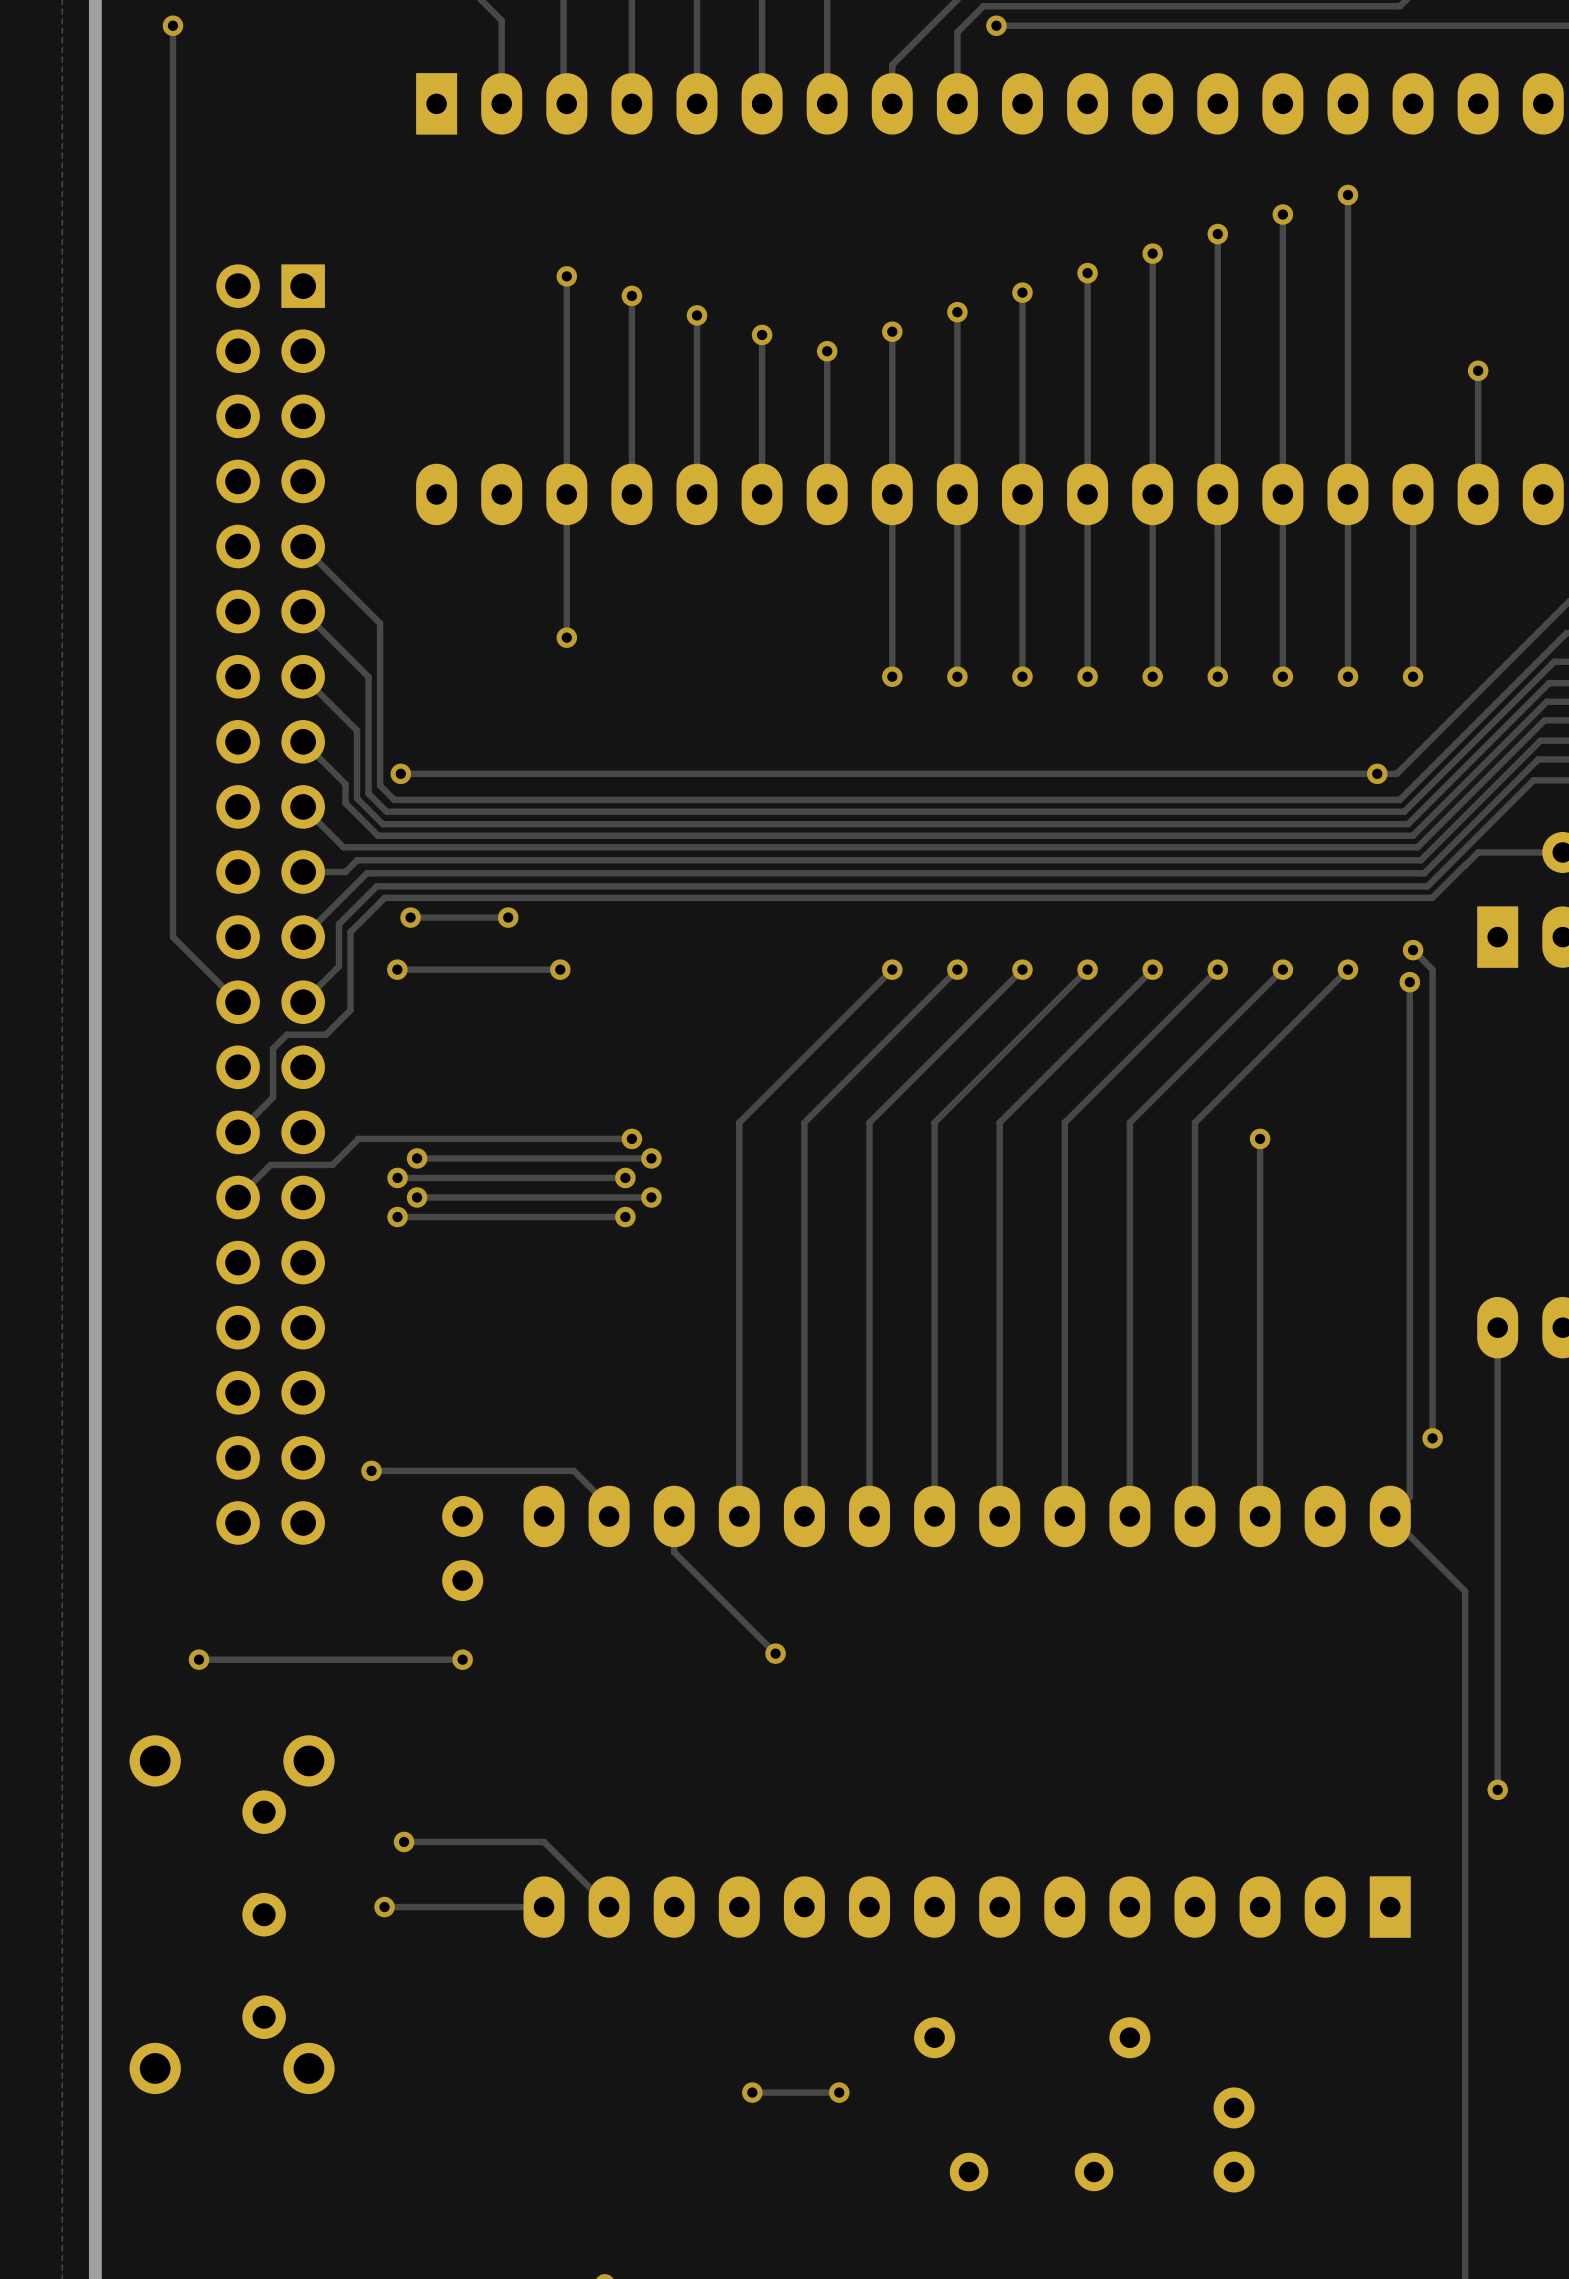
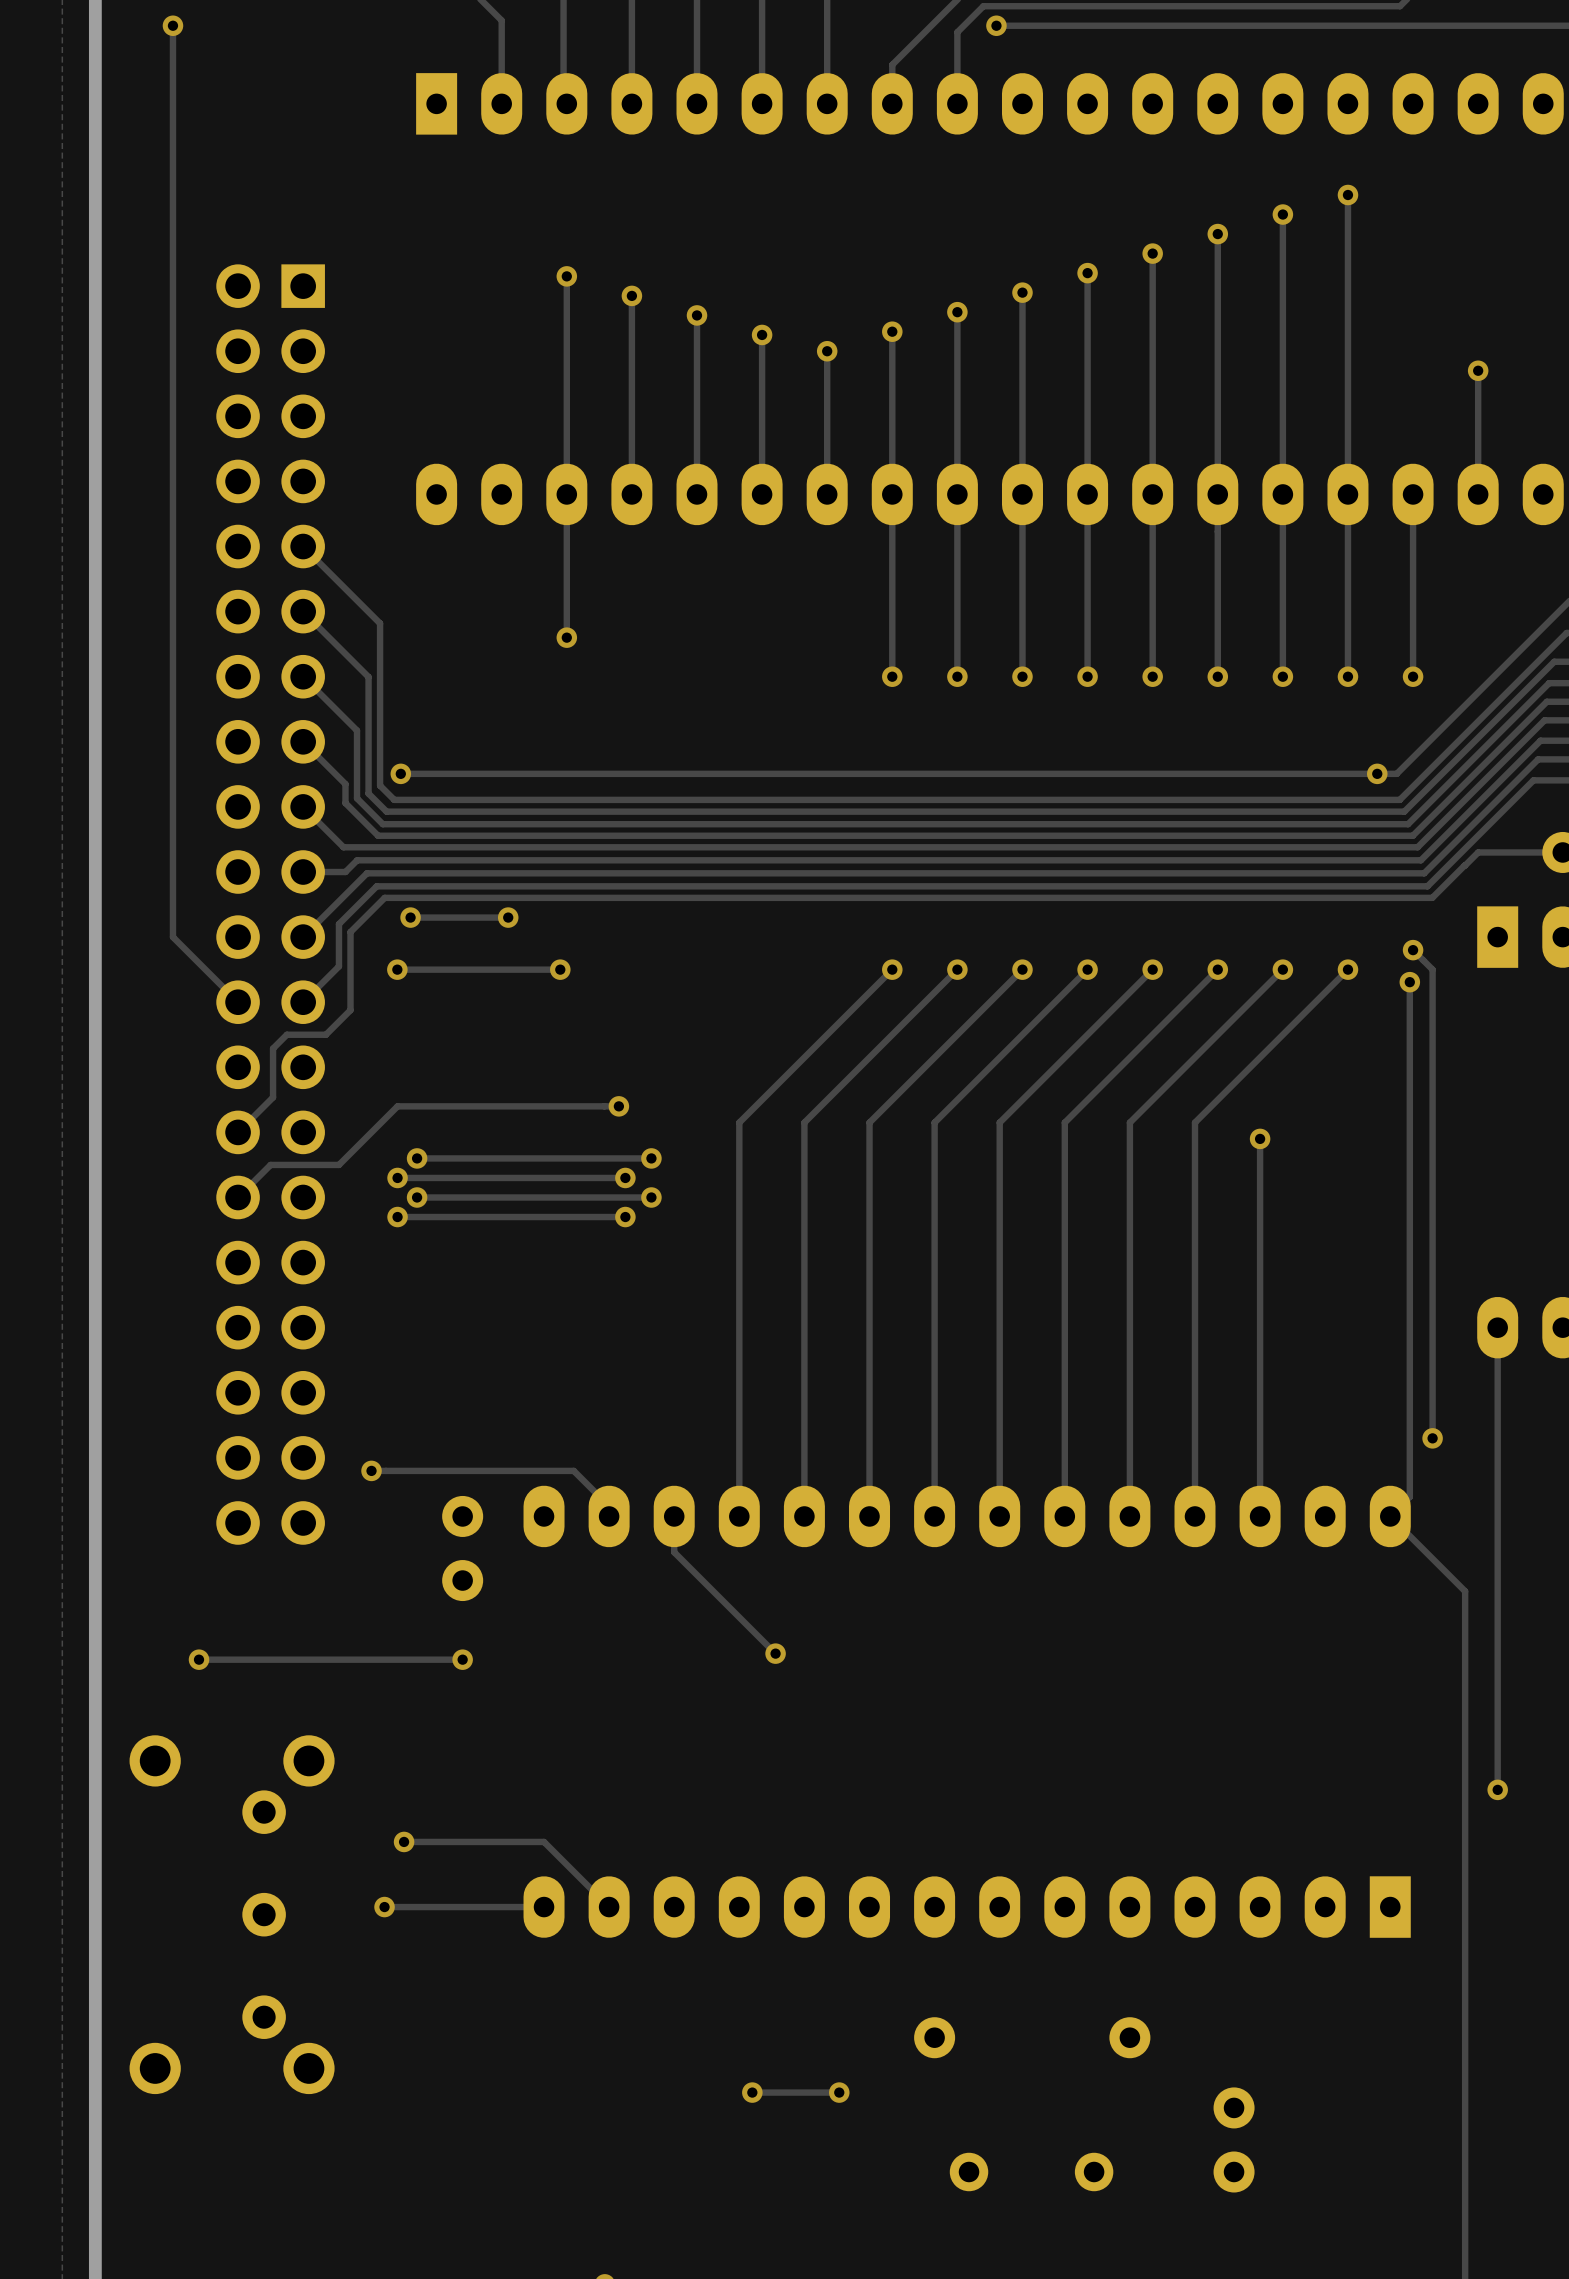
track: (631, 1138) (358, 1138) (332, 1164) -> (618, 1106) (397, 1106) (338, 1164) (332, 1164)
via position: (631, 1138) -> (618, 1106)

